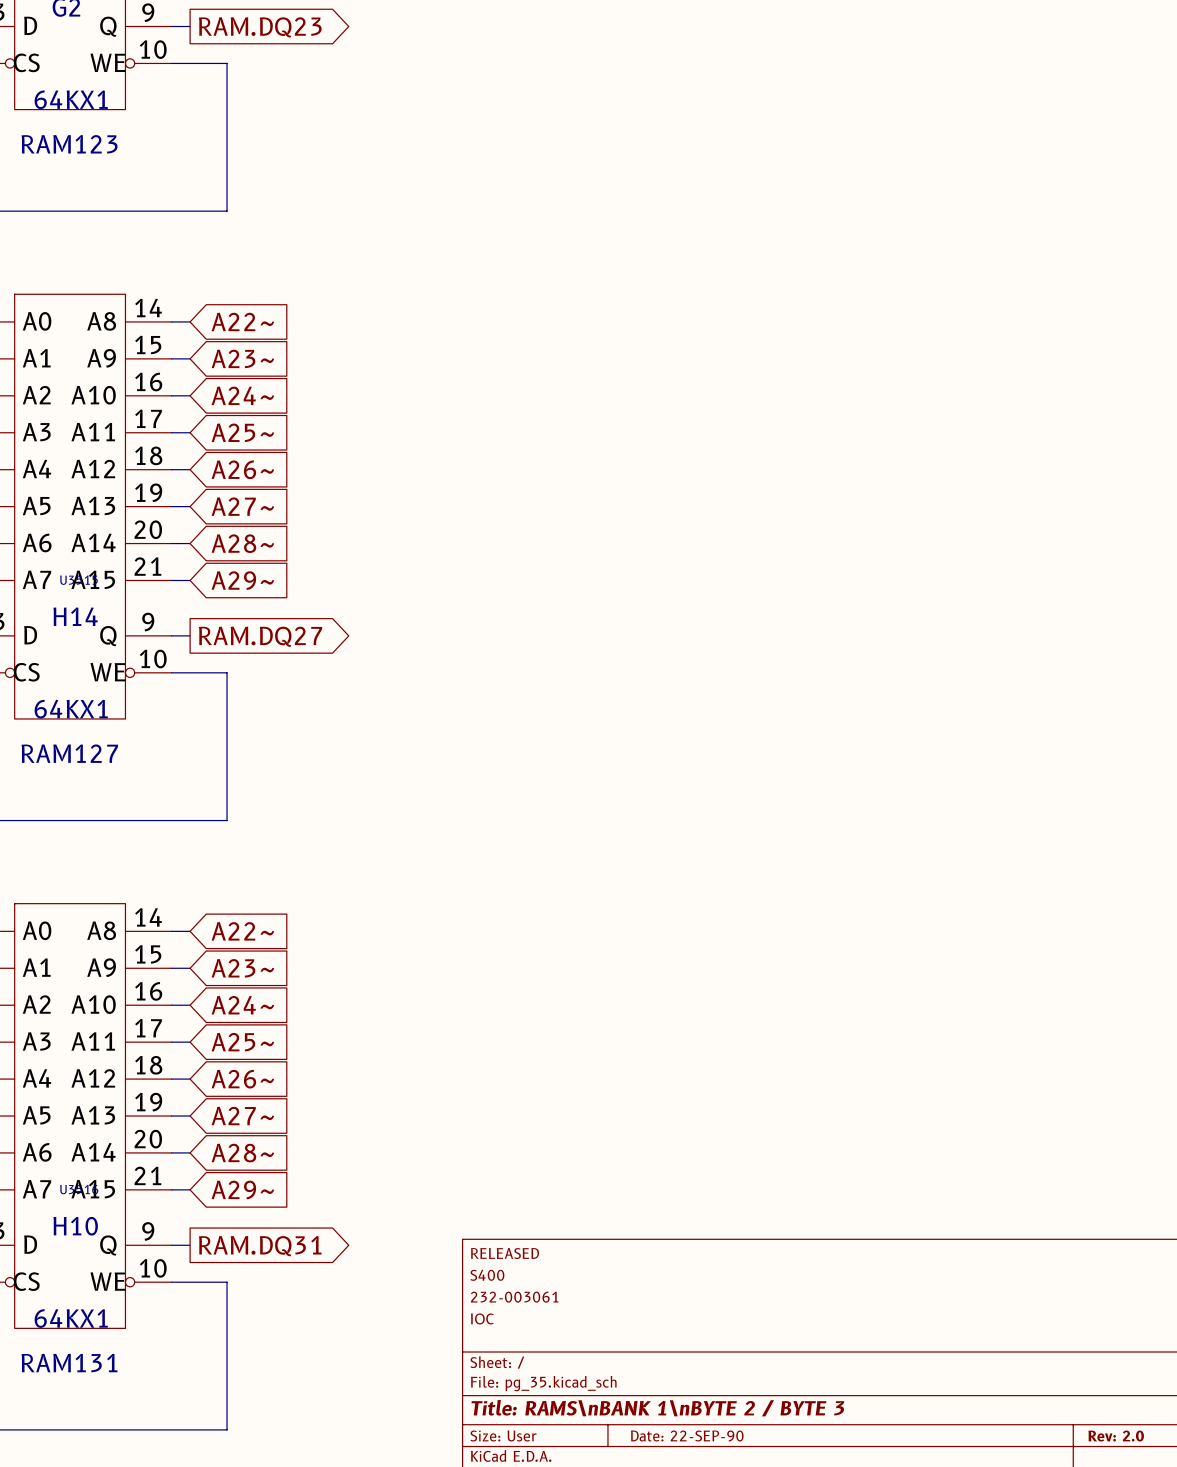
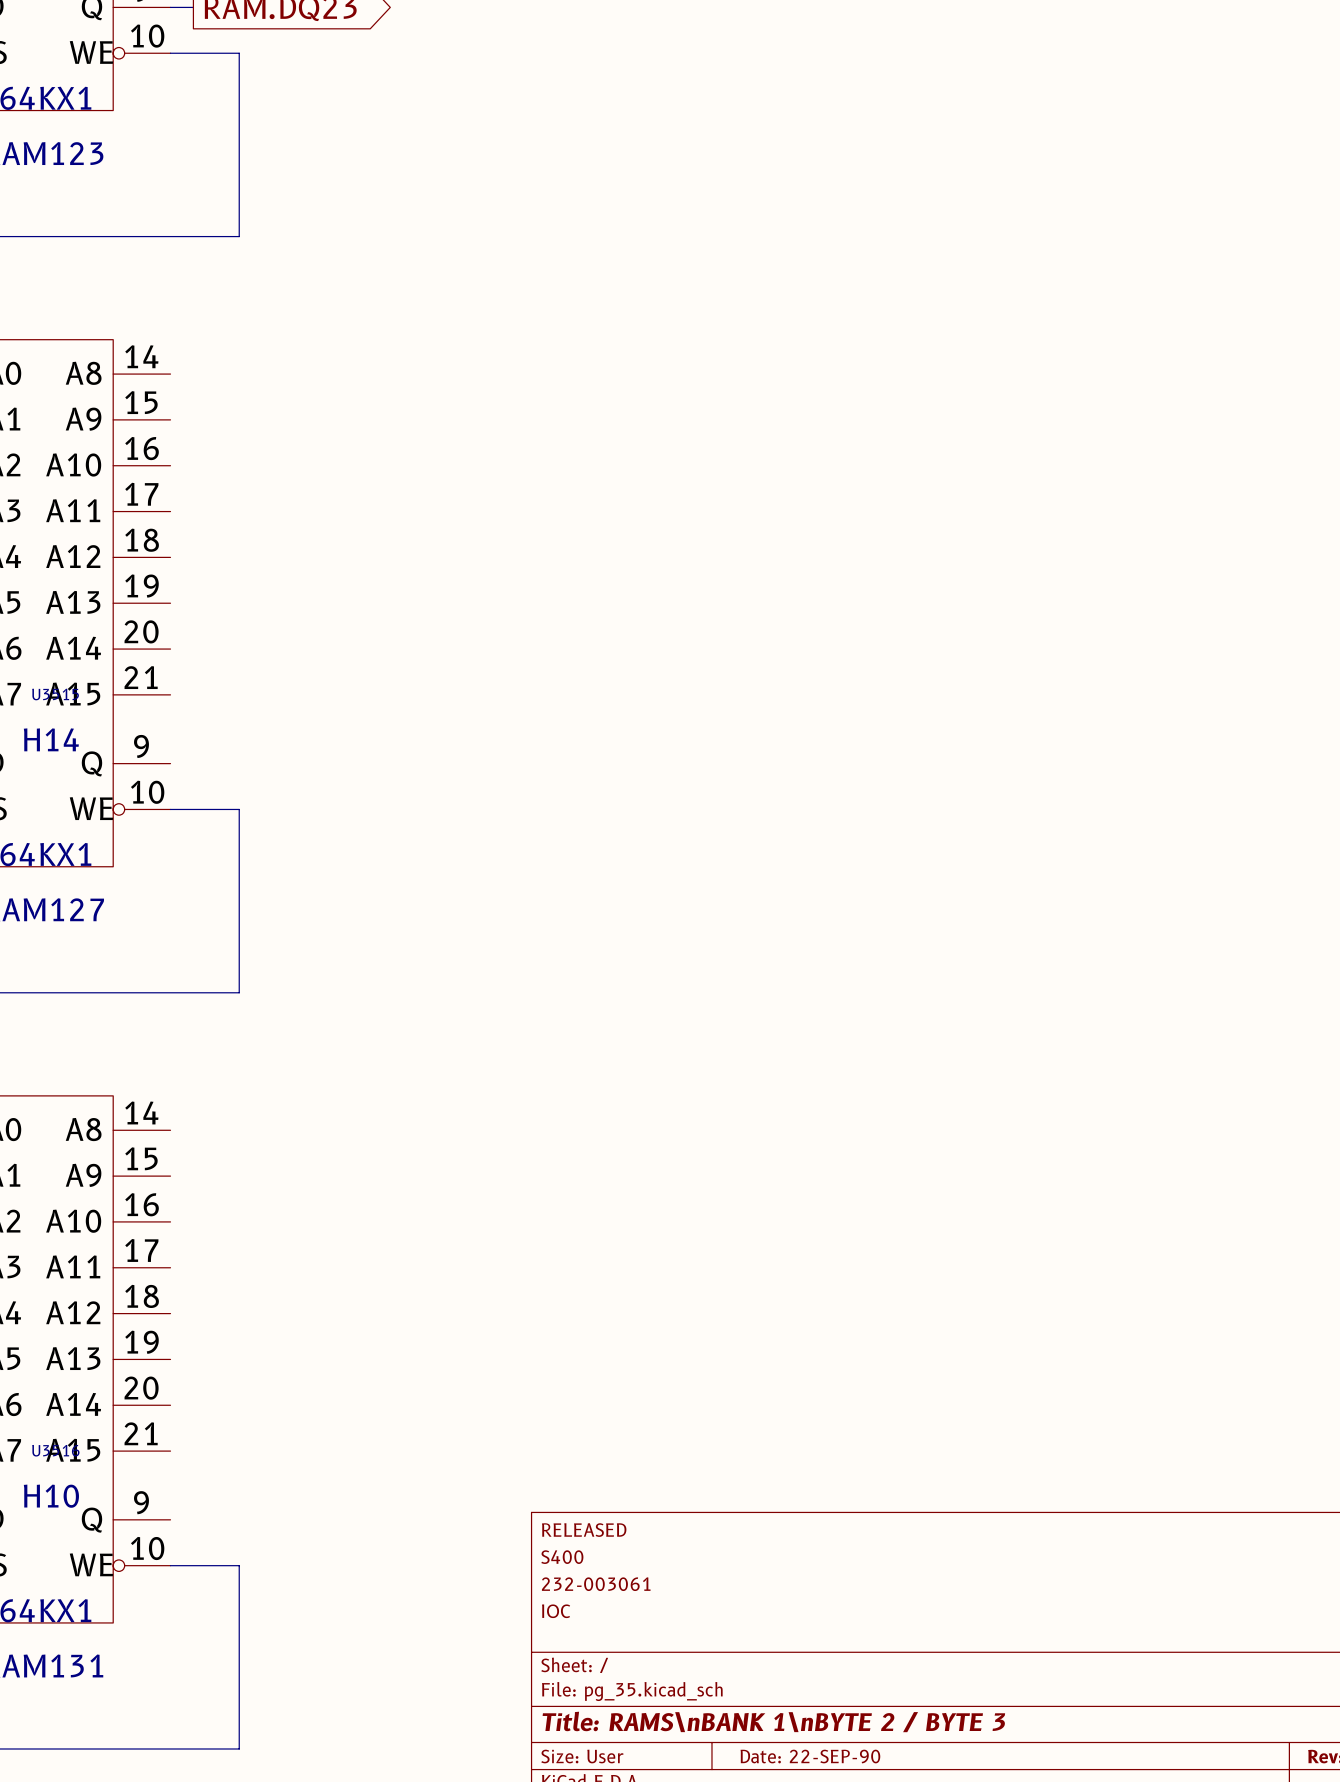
wire: (171, 321) (190, 321) -> none
global label: A22~ (242, 321) -> none
wire: (171, 358) (190, 358) -> none
global label: A23~ (242, 358) -> none
wire: (171, 395) (190, 395) -> none
global label: A24~ (242, 395) -> none
wire: (171, 432) (190, 432) -> none
global label: A25~ (242, 432) -> none
wire: (171, 469) (190, 469) -> none
global label: A26~ (242, 469) -> none
wire: (171, 506) (190, 506) -> none
global label: A27~ (242, 506) -> none
wire: (171, 543) (190, 543) -> none
global label: A28~ (242, 543) -> none
wire: (171, 580) (190, 580) -> none
global label: A29~ (242, 580) -> none
wire: (171, 635) (190, 635) -> none
global label: RAM.DQ27 (260, 636) -> none
wire: (171, 931) (190, 931) -> none
global label: A22~ (242, 931) -> none
wire: (171, 968) (190, 968) -> none
global label: A23~ (242, 968) -> none
wire: (171, 1005) (190, 1005) -> none
global label: A24~ (242, 1005) -> none
wire: (171, 1042) (190, 1042) -> none
global label: A25~ (242, 1042) -> none
wire: (171, 1079) (190, 1079) -> none
global label: A26~ (242, 1079) -> none
wire: (171, 1116) (190, 1116) -> none
global label: A27~ (242, 1116) -> none
wire: (171, 1152) (190, 1152) -> none
global label: A28~ (242, 1153) -> none
wire: (171, 1189) (190, 1189) -> none
global label: A29~ (242, 1189) -> none
wire: (171, 1245) (190, 1245) -> none
global label: RAM.DQ31 (260, 1246) -> none

